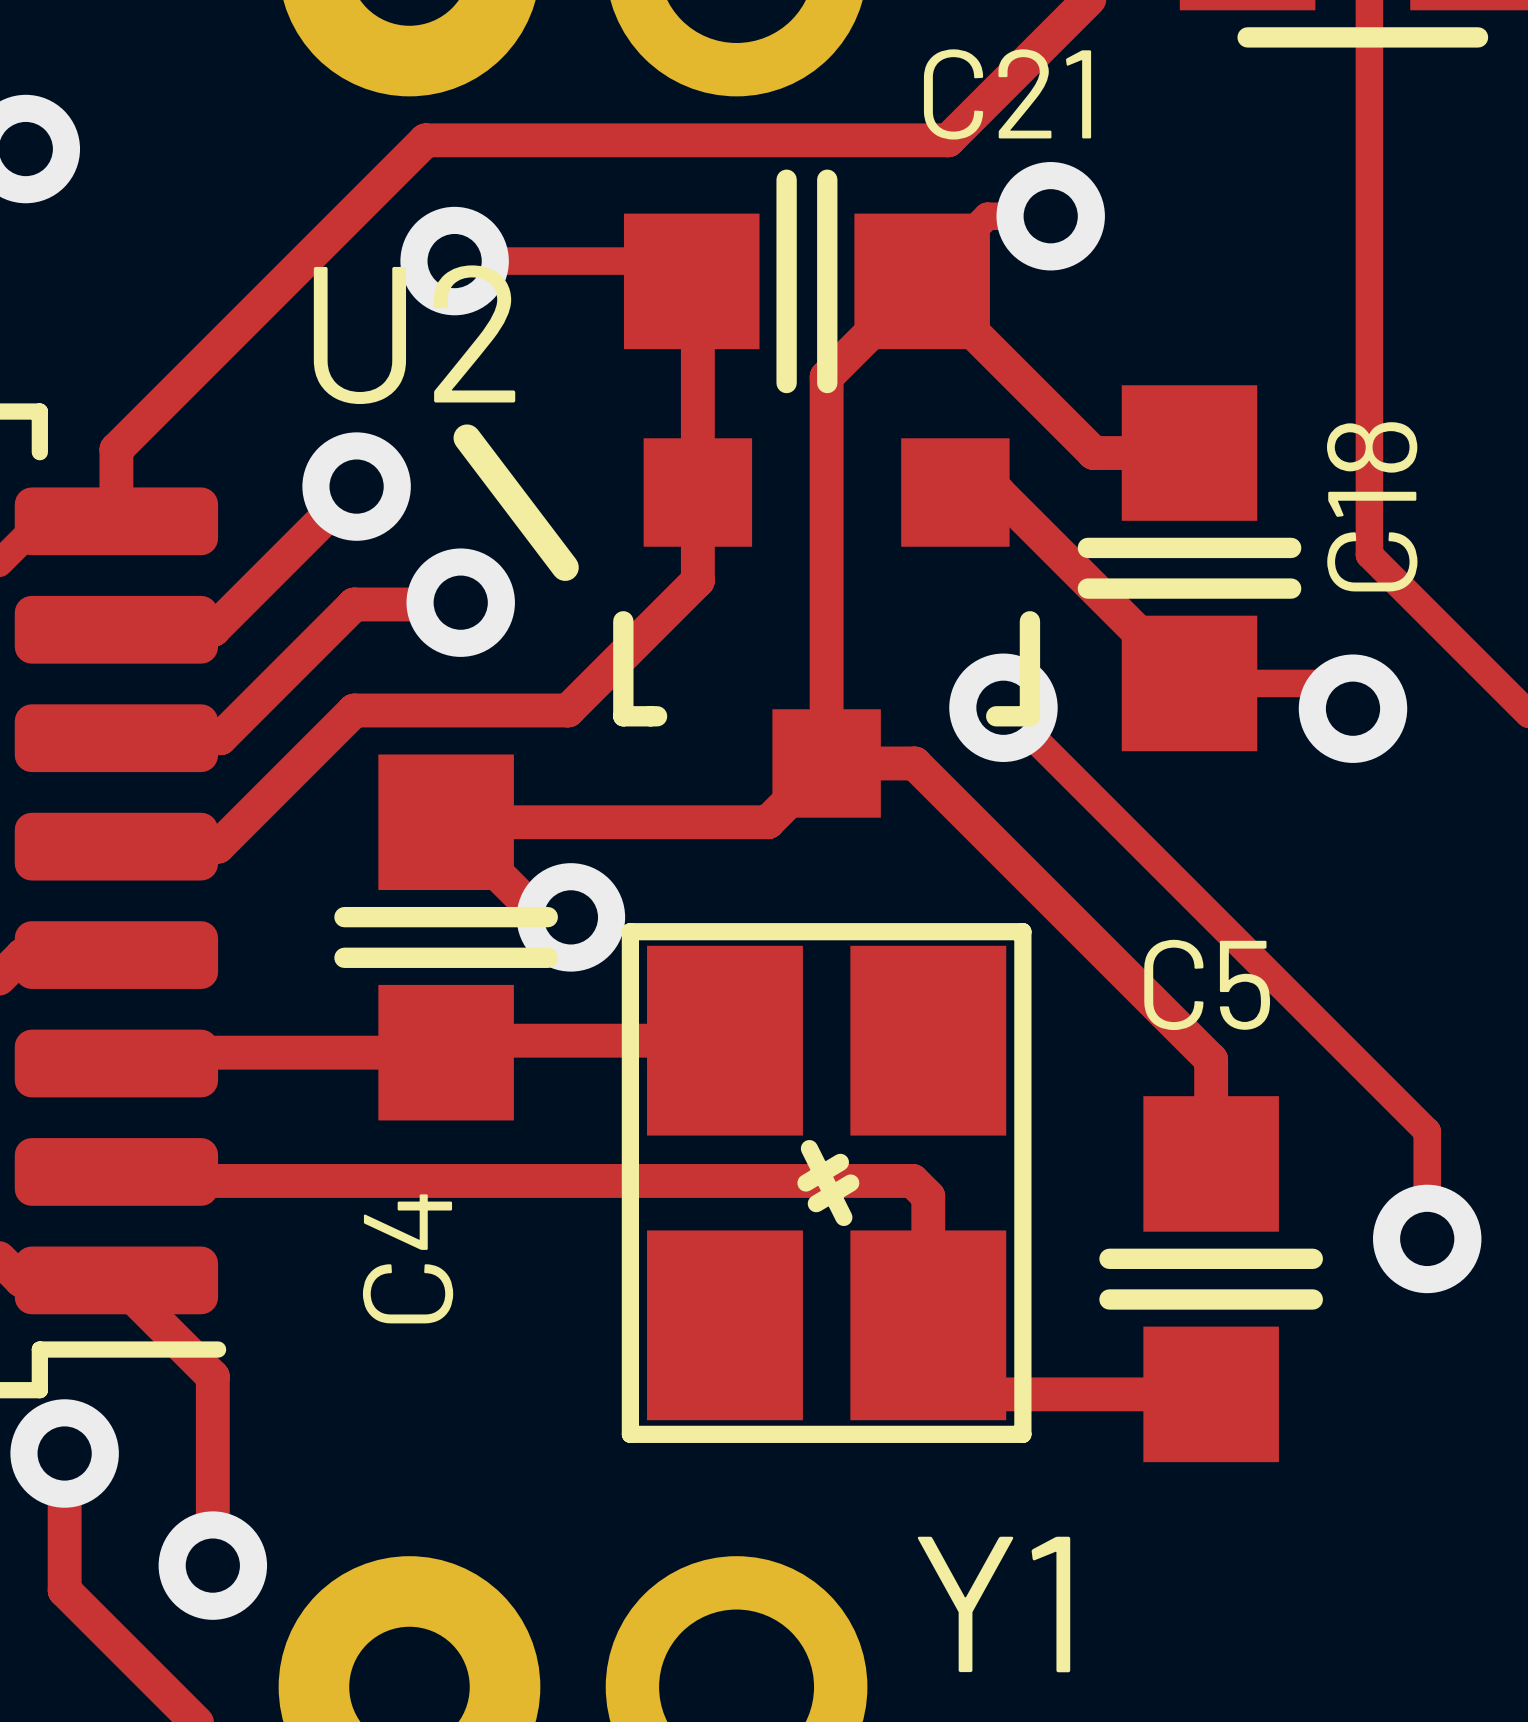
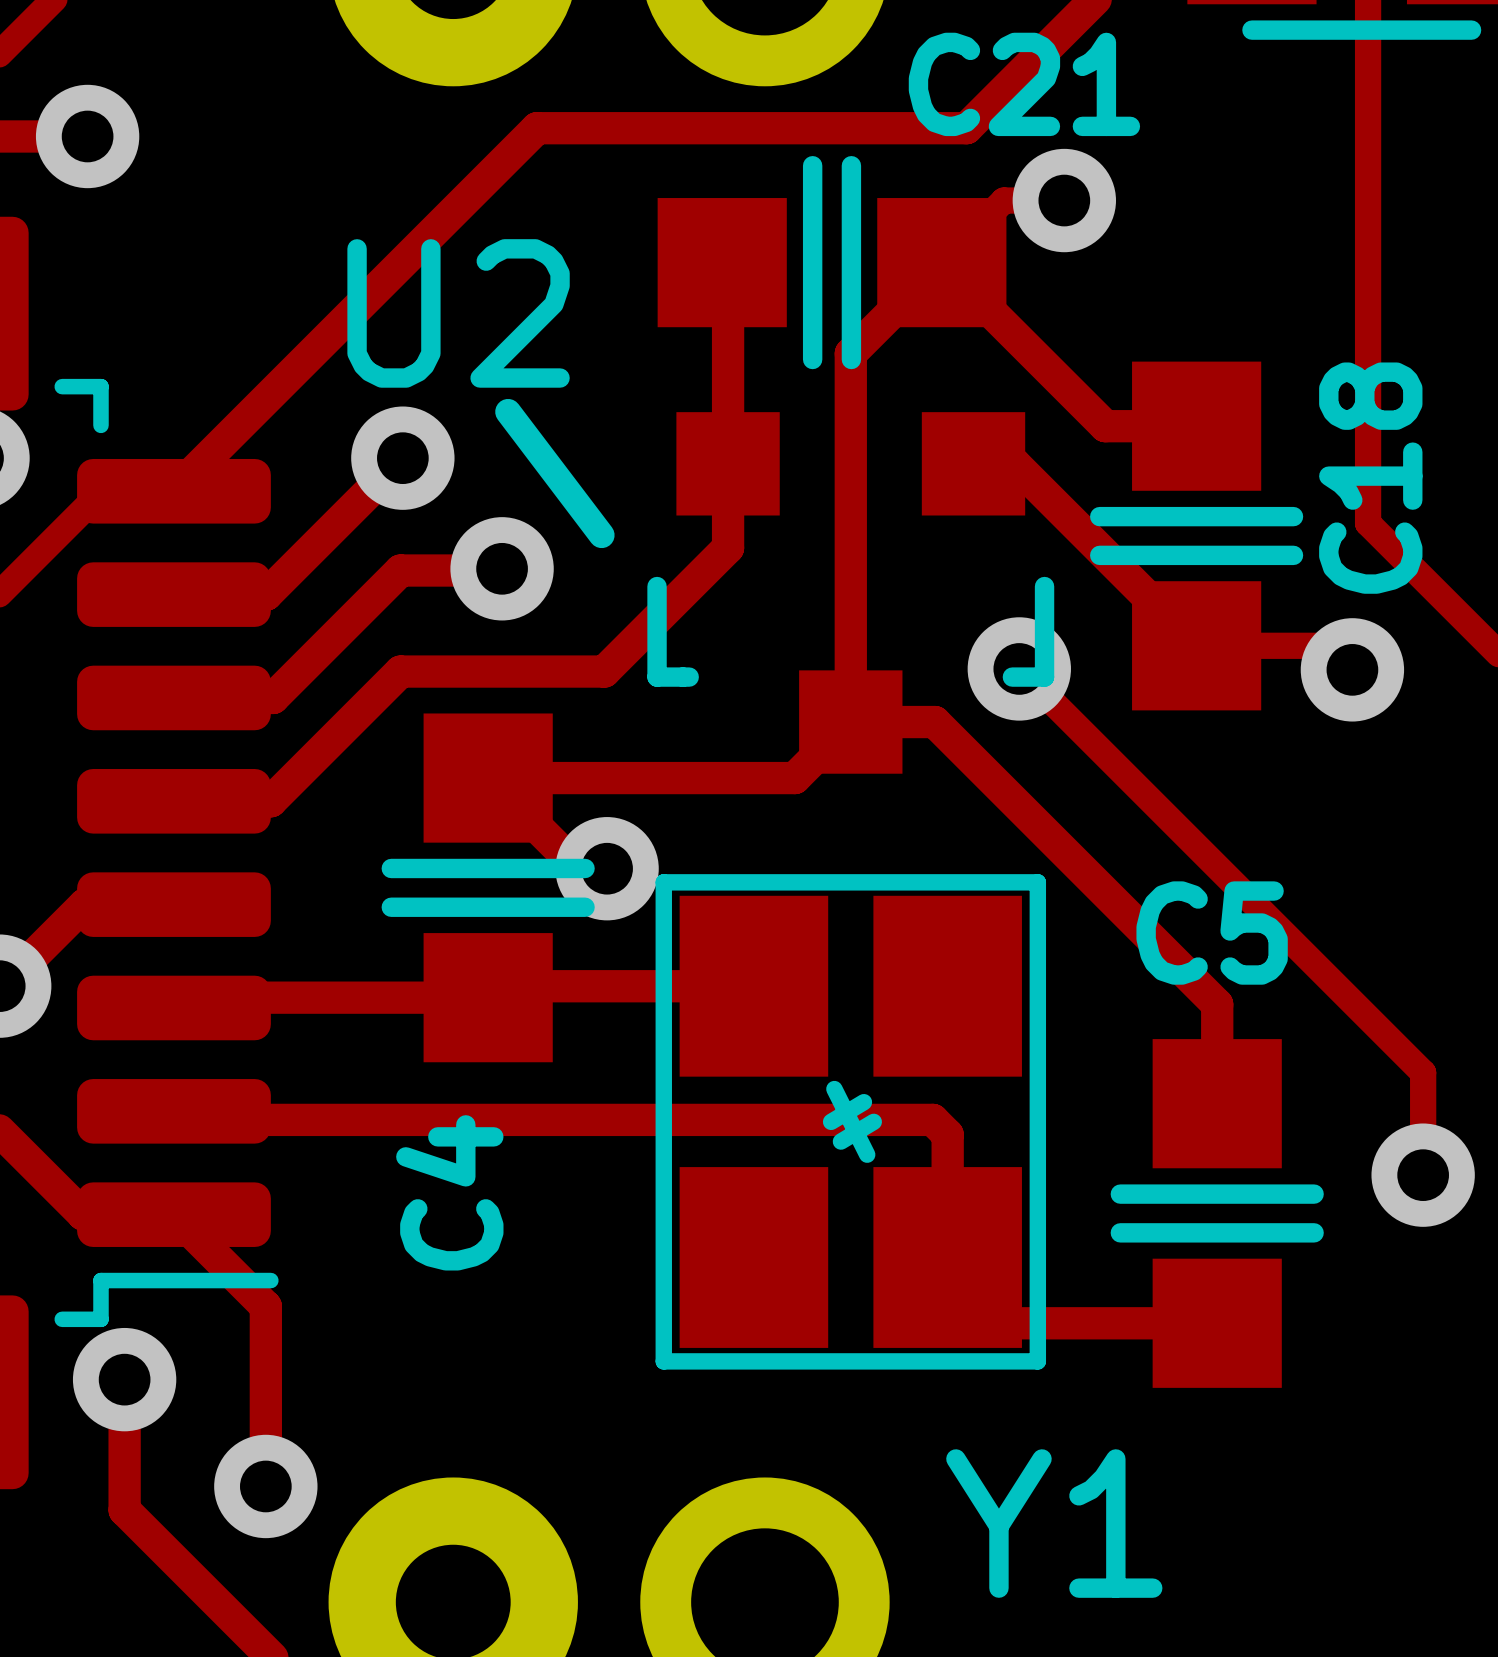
track: (497, 140) (425, 140) (116, 449) (116, 521) -> (537, 128) (173, 491)
track: (454, 261) (671, 261) (691, 281) -> none
via: (454, 261) -> none

